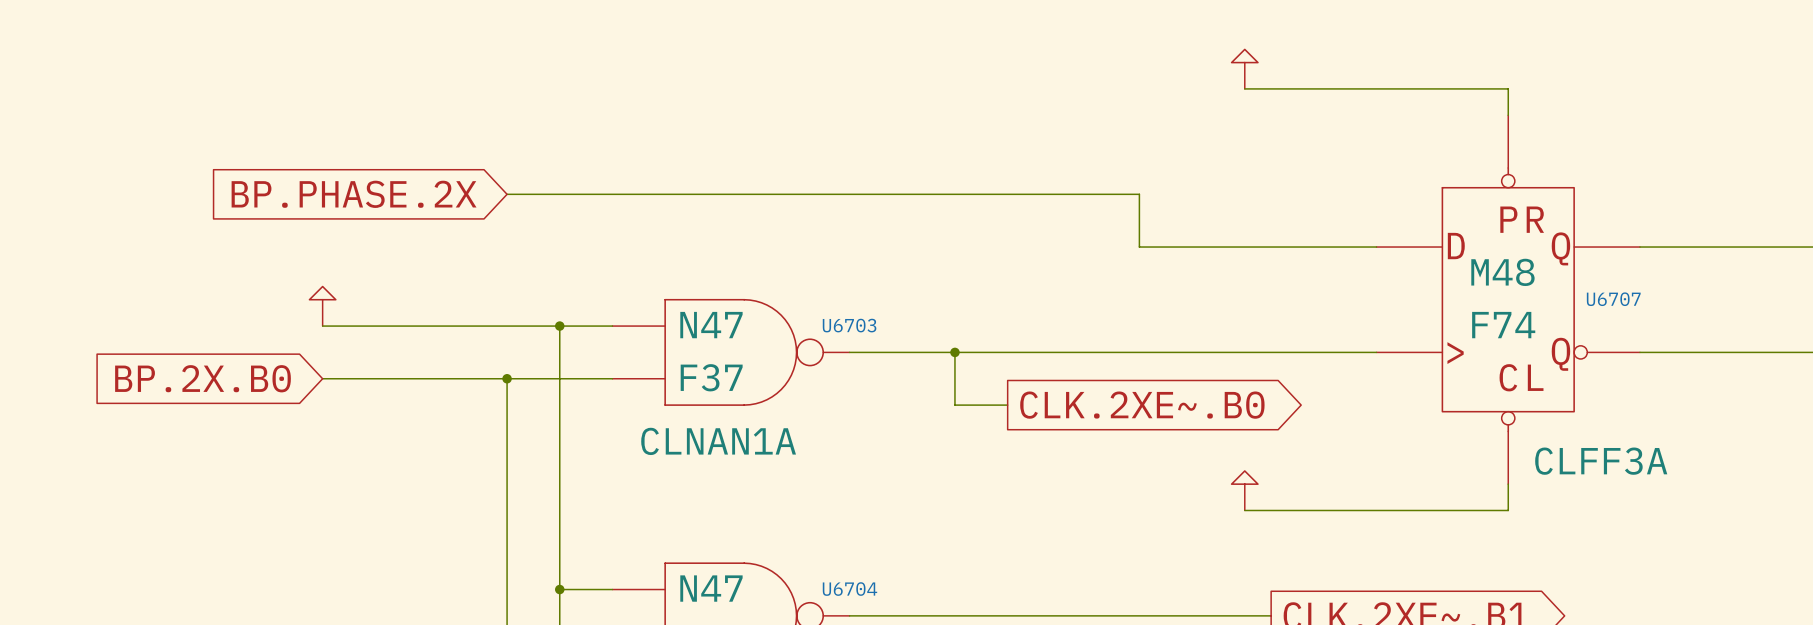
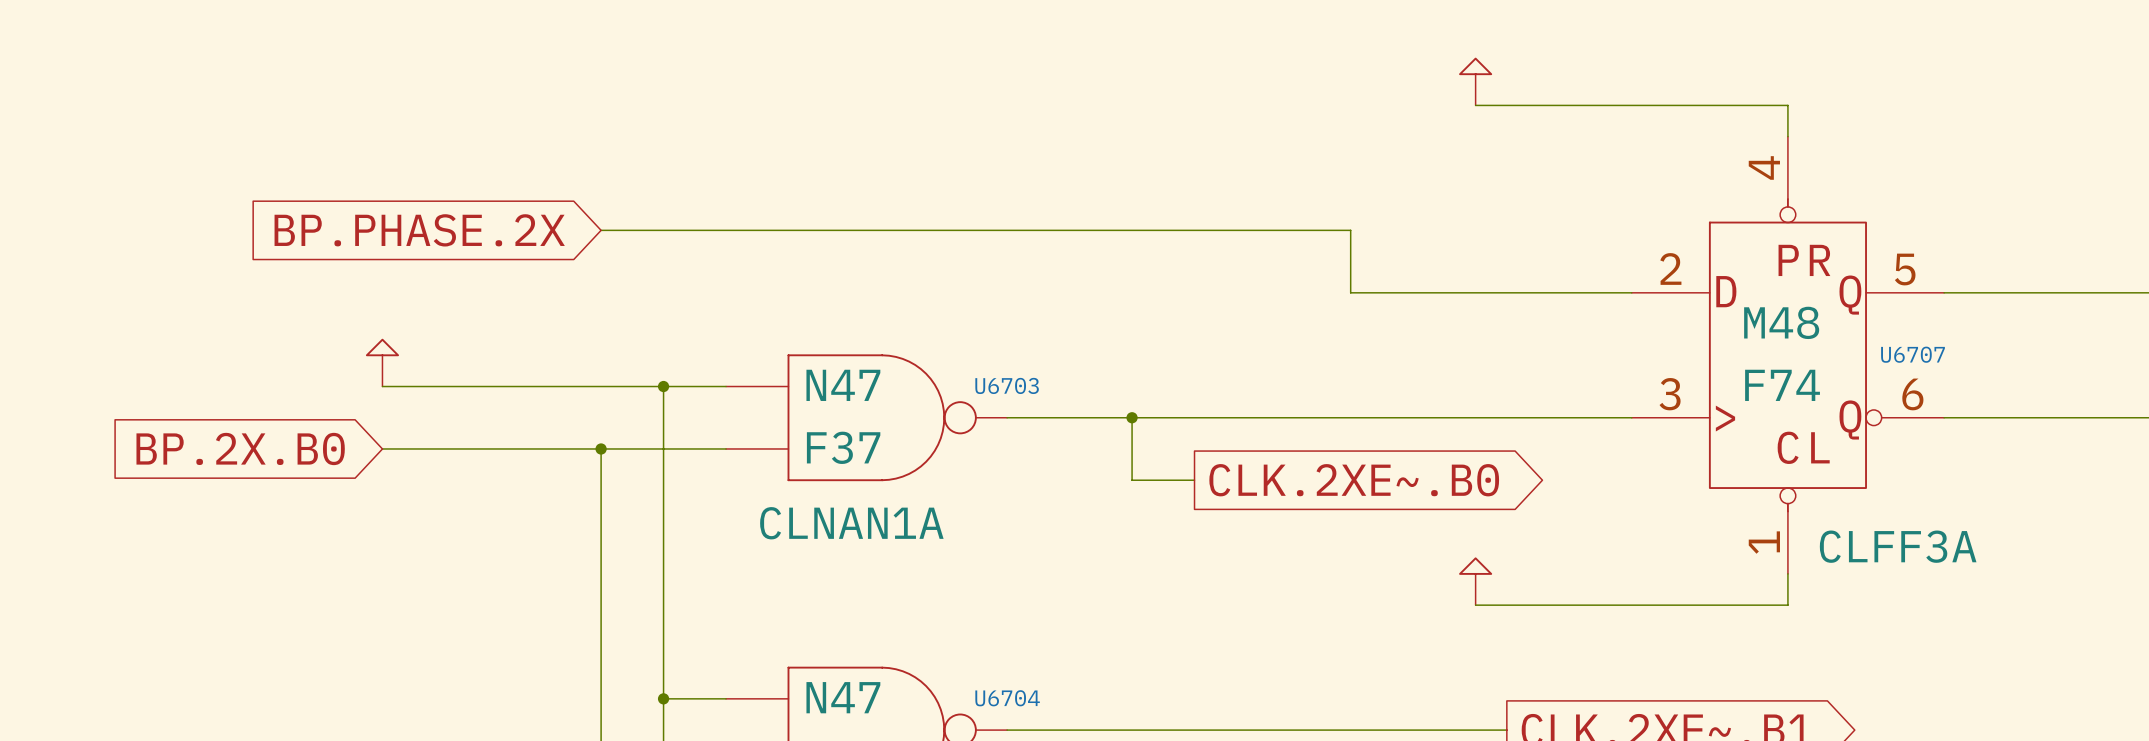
U6707 pin number: none -> 4 (1764, 167)
U6707 pin number: none -> 2 (1670, 268)
U6707 pin number: none -> 5 (1905, 269)
U6707 pin number: none -> 3 (1670, 394)
U6707 pin number: none -> 6 (1912, 394)
U6707 pin number: none -> 1 (1764, 542)

